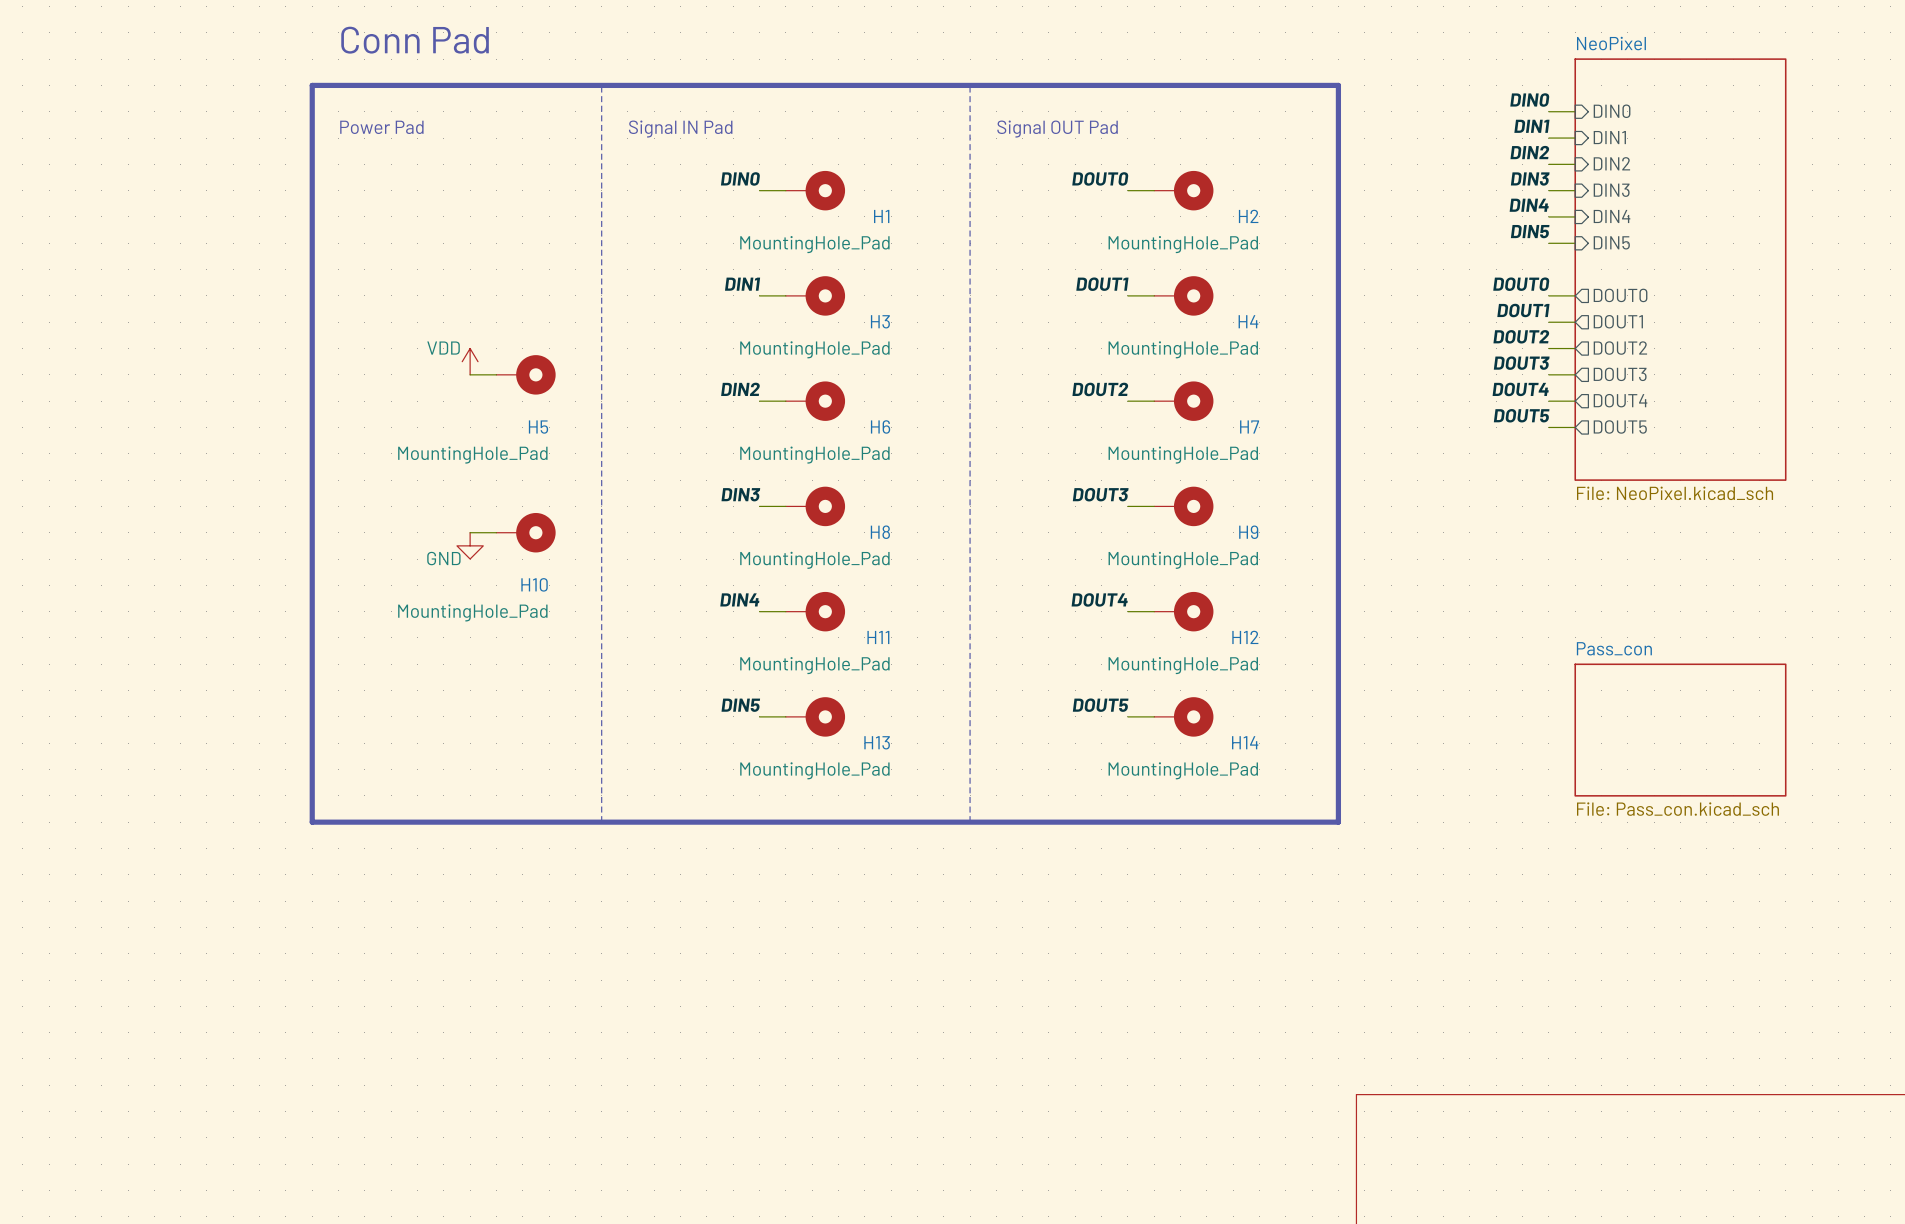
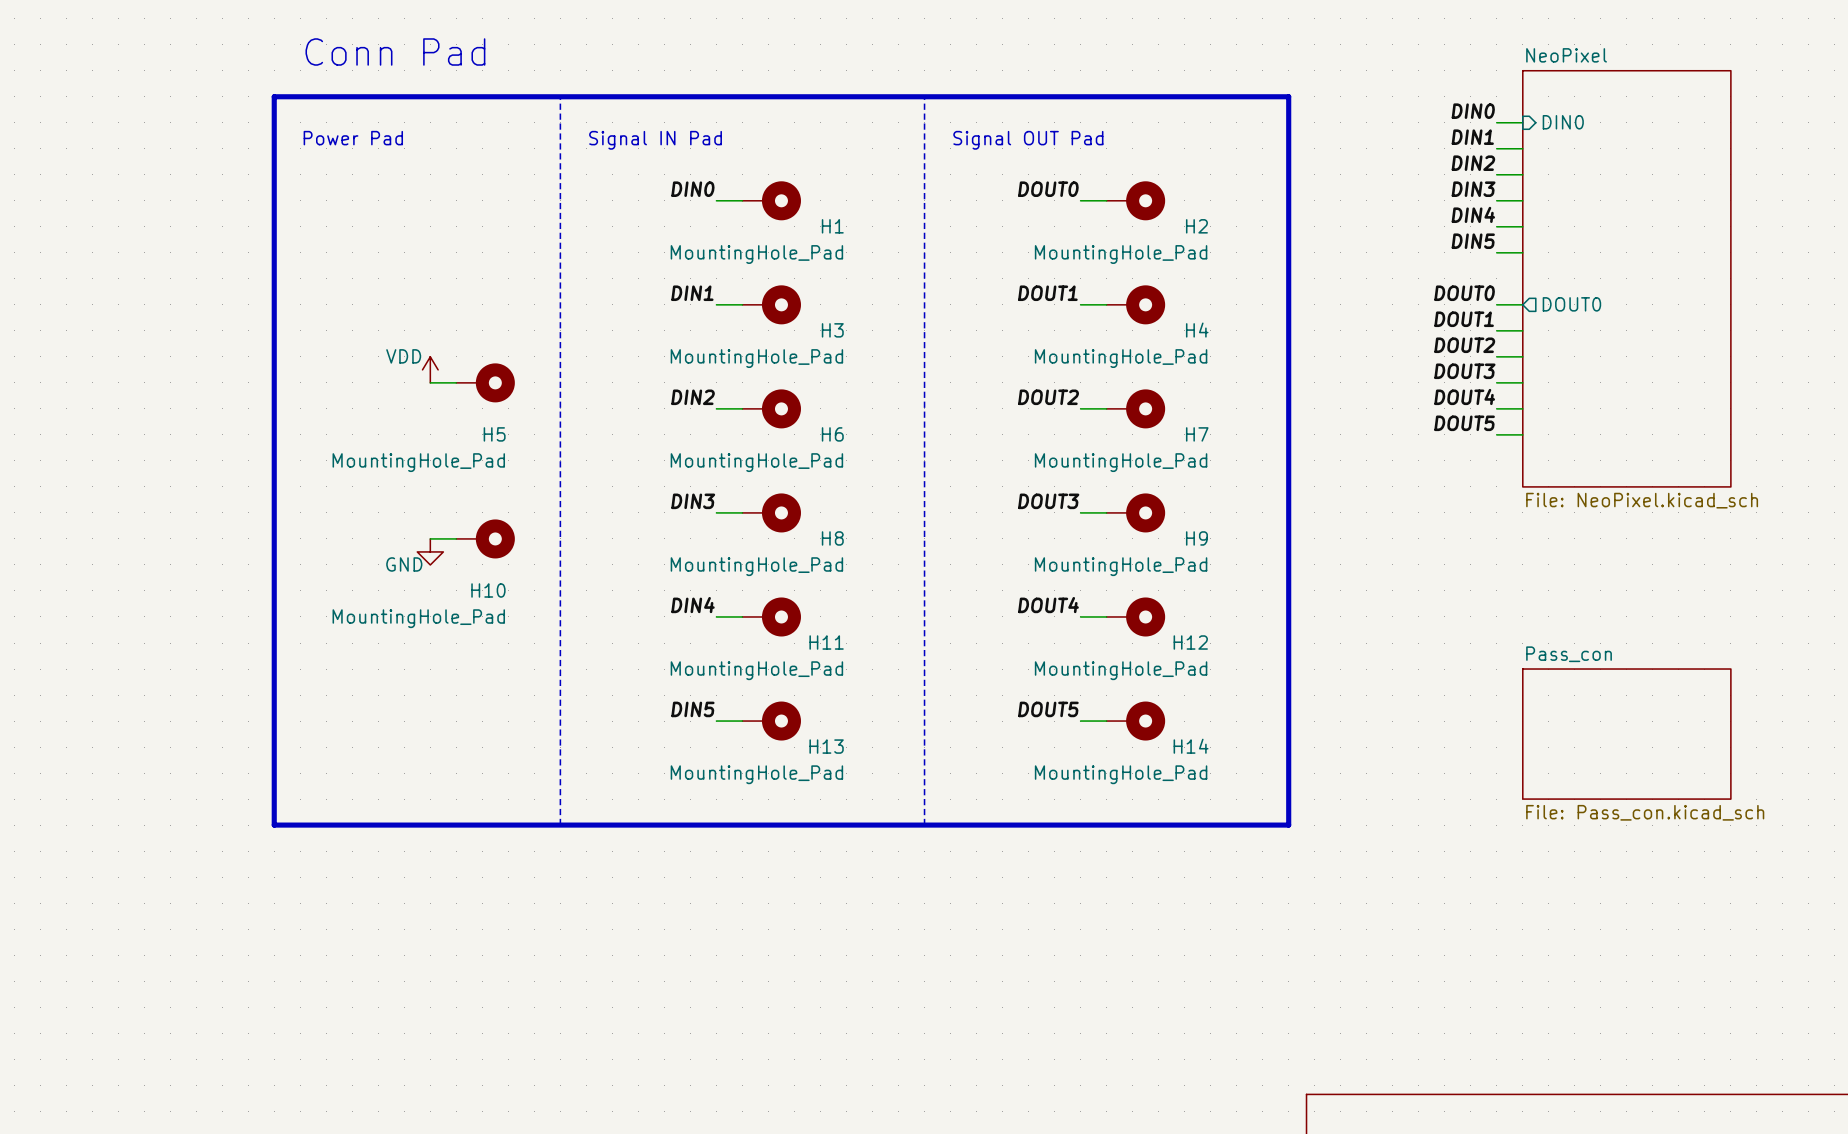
sheet pin: DIN1 (1609, 137) -> none
sheet pin: DIN2 (1611, 163) -> none
sheet pin: DIN3 (1611, 190) -> none
sheet pin: DIN4 (1612, 216) -> none
sheet pin: DIN5 (1611, 242) -> none
sheet pin: DOUT1 (1618, 321) -> none
sheet pin: DOUT2 (1620, 348) -> none
sheet pin: DOUT3 (1620, 374) -> none
sheet pin: DOUT4 (1620, 400) -> none
sheet pin: DOUT5 (1620, 426) -> none

